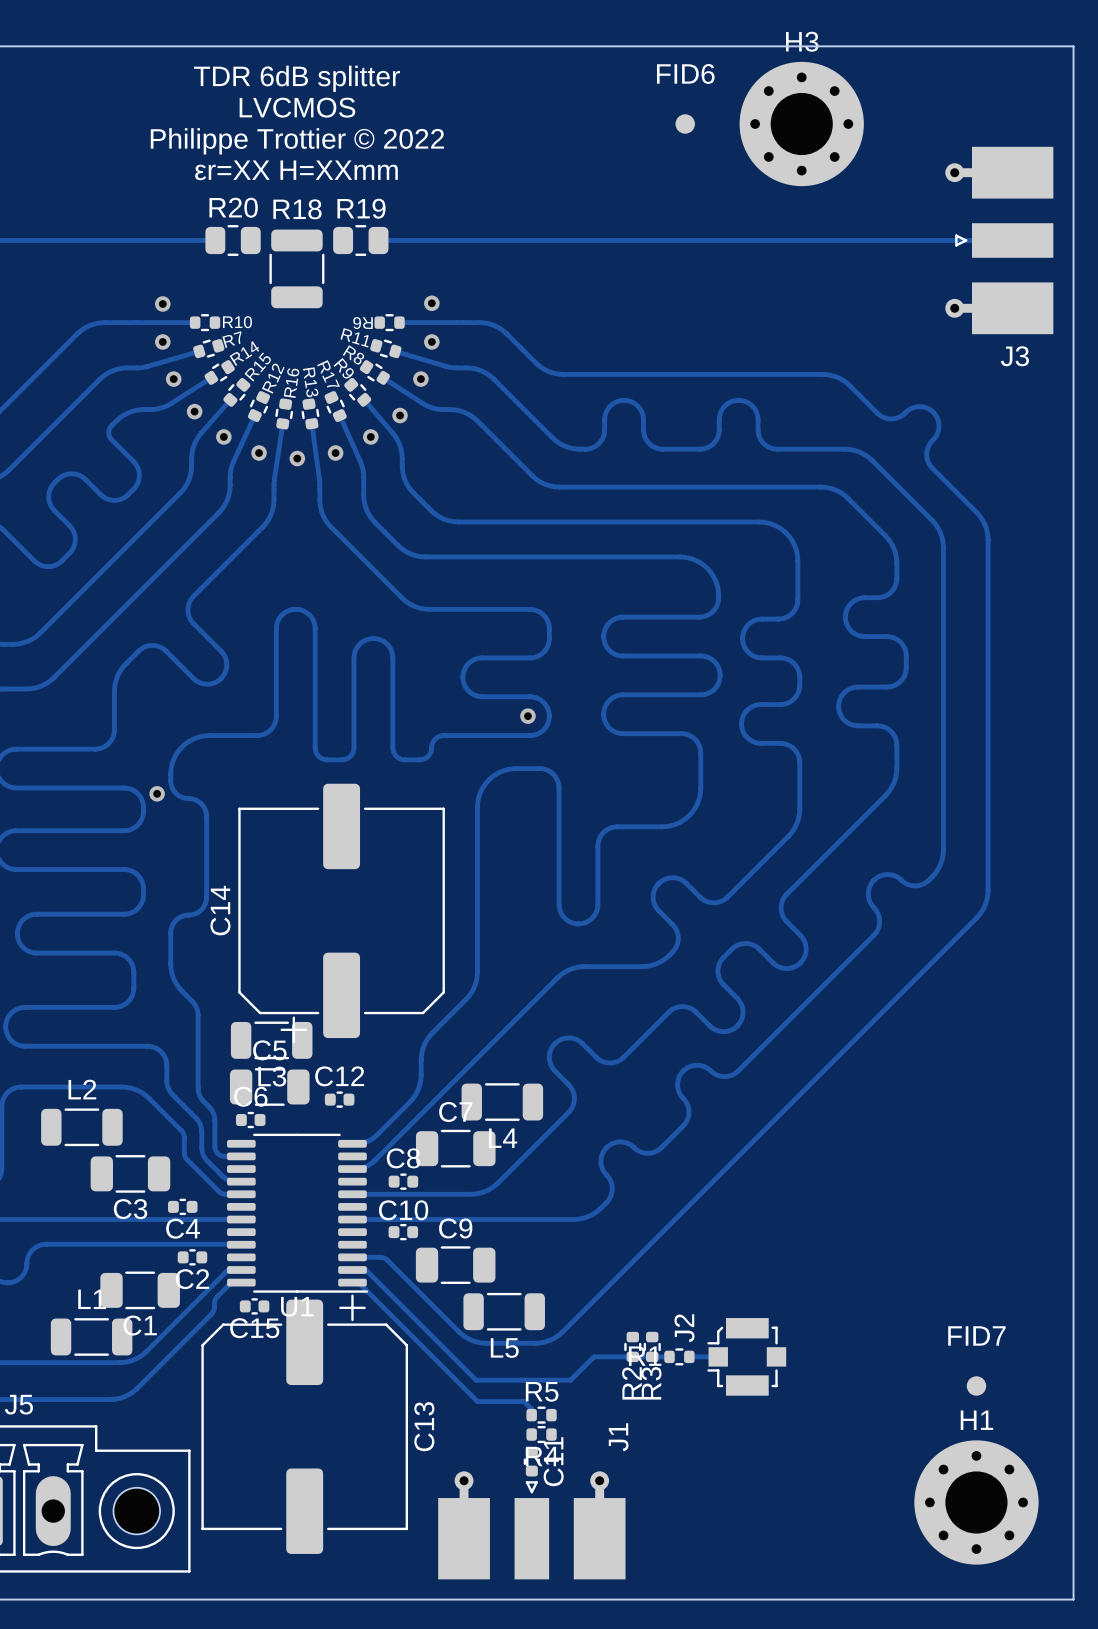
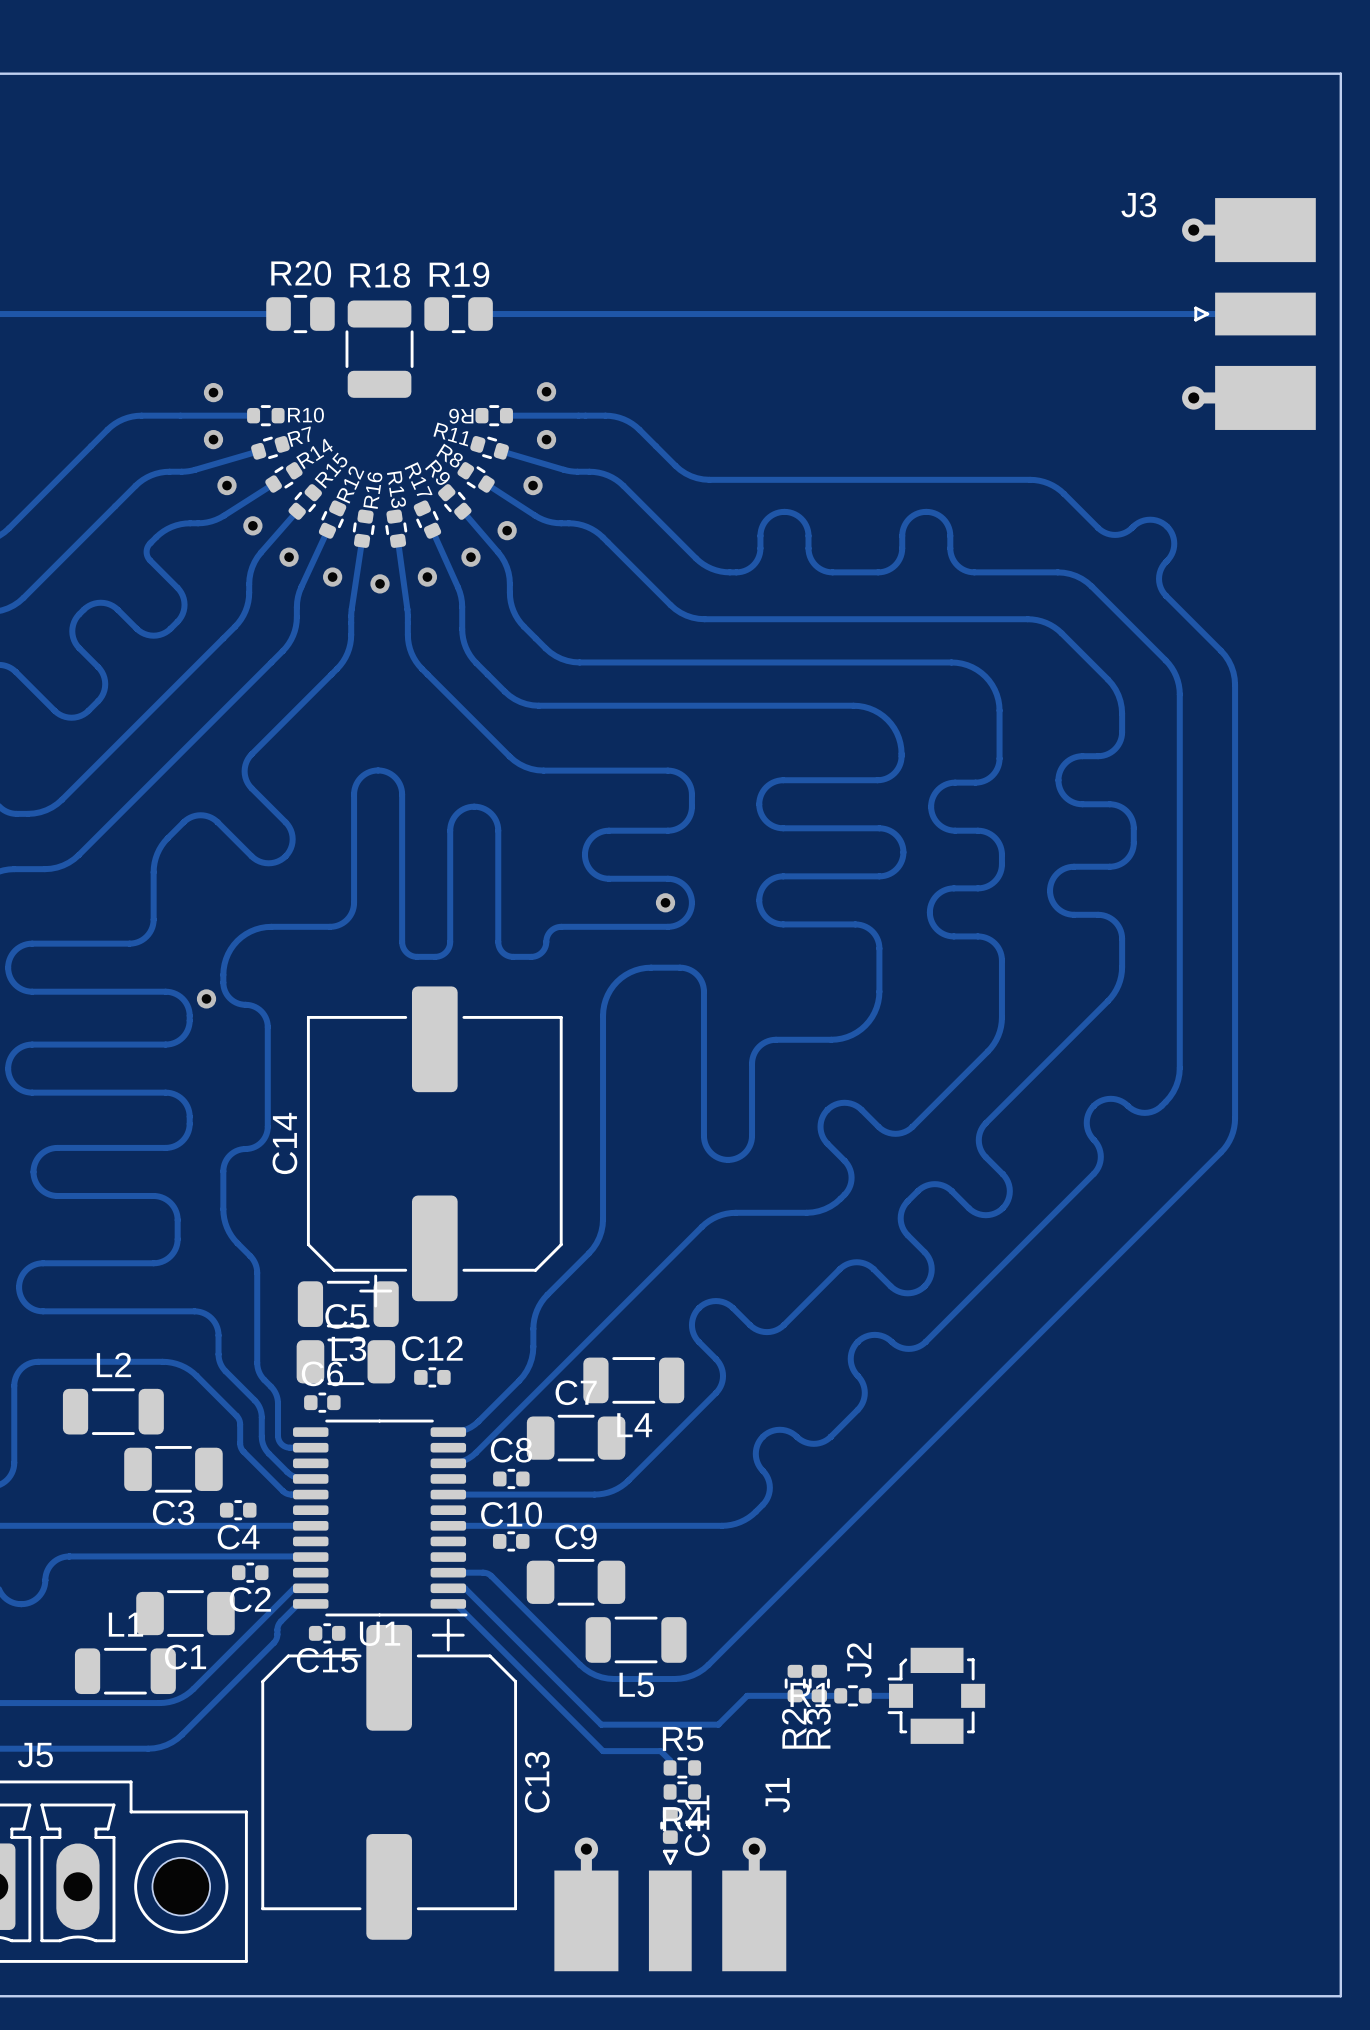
text: TDR 6dB splitter (297, 78) -> none
text: LVCMOS (297, 107) -> none
FID6: (685, 124) -> none
H3: (801, 124) -> none
text: Philippe Trottier © 2022 (297, 141) -> none
text: εr=XX H=XXmm (296, 170) -> none
J3 name position: J3 (1014, 356) -> J3 (1138, 204)
FID7: (976, 1386) -> none
H1: (976, 1502) -> none

